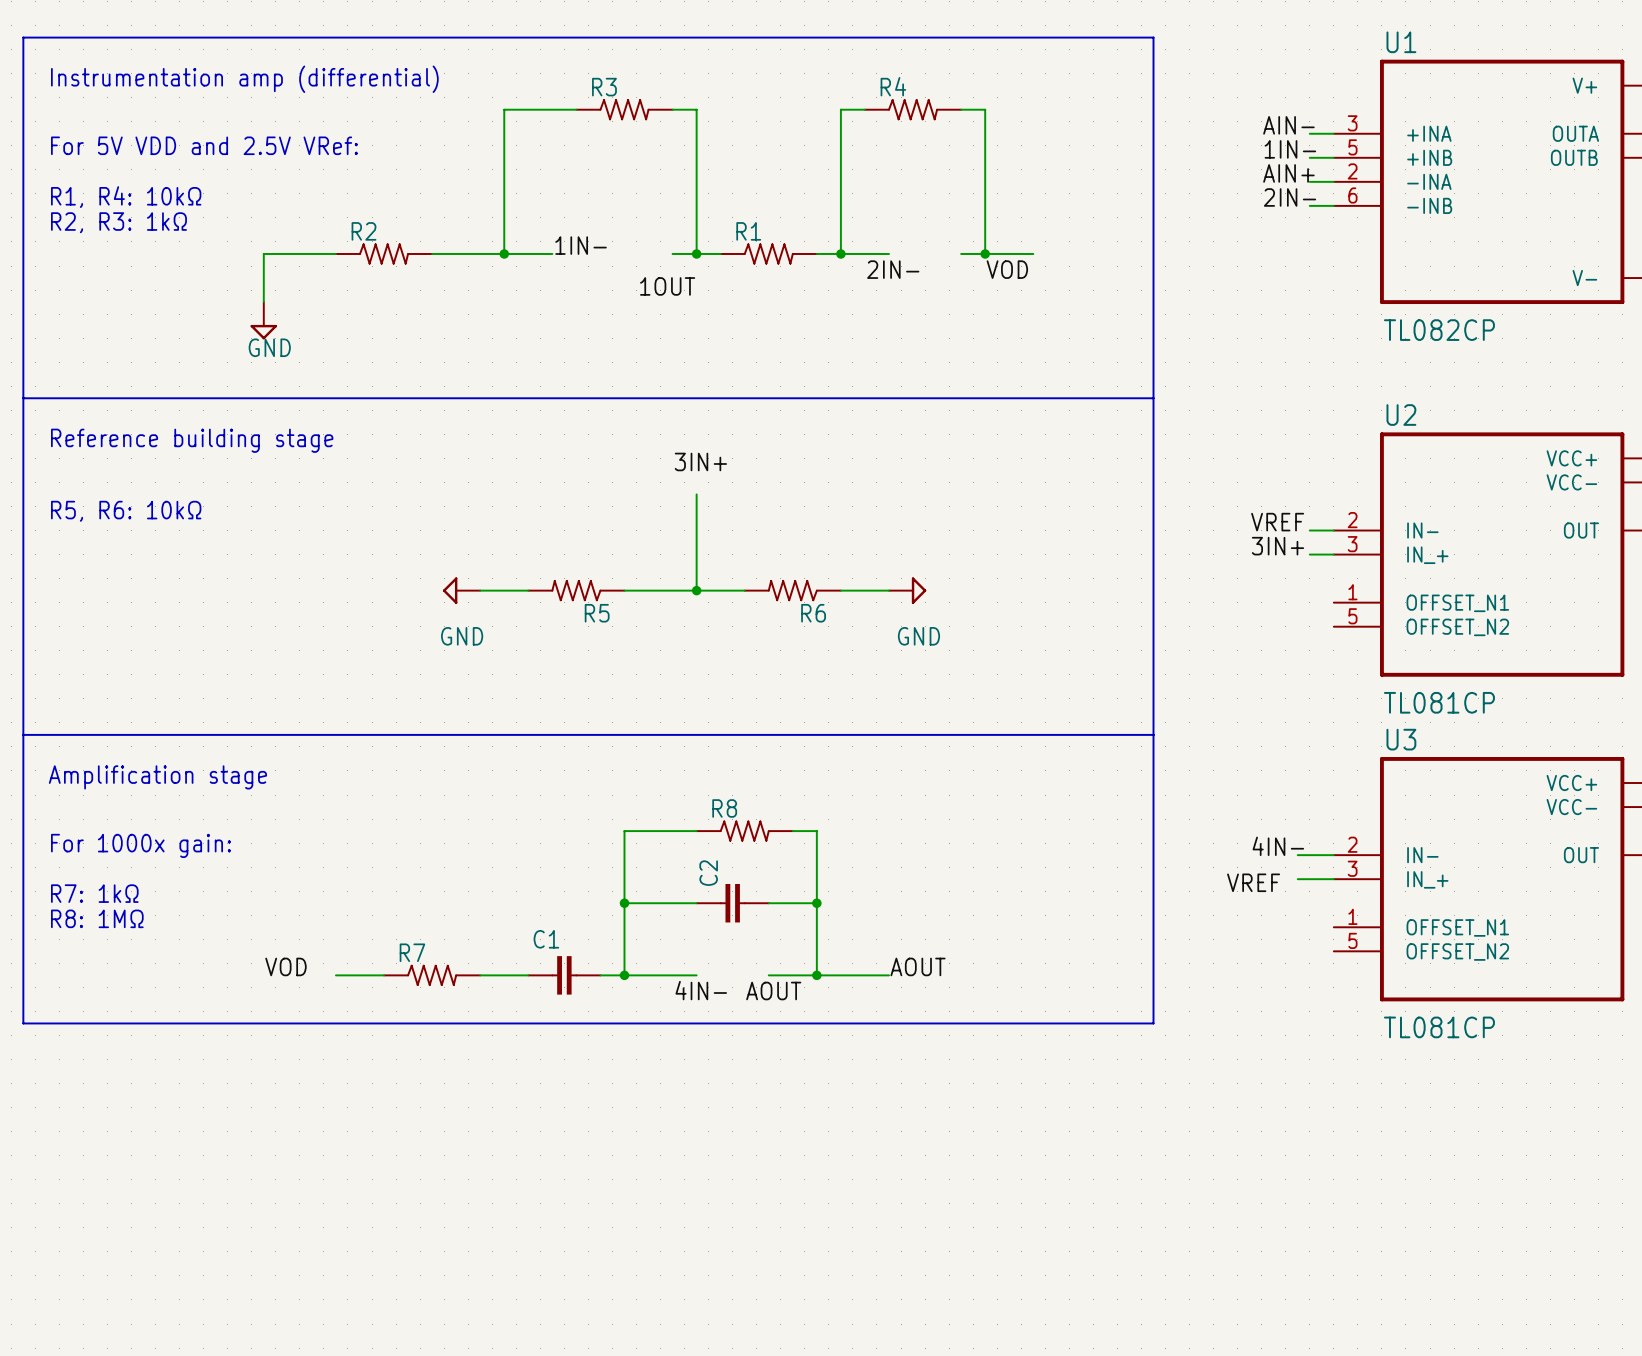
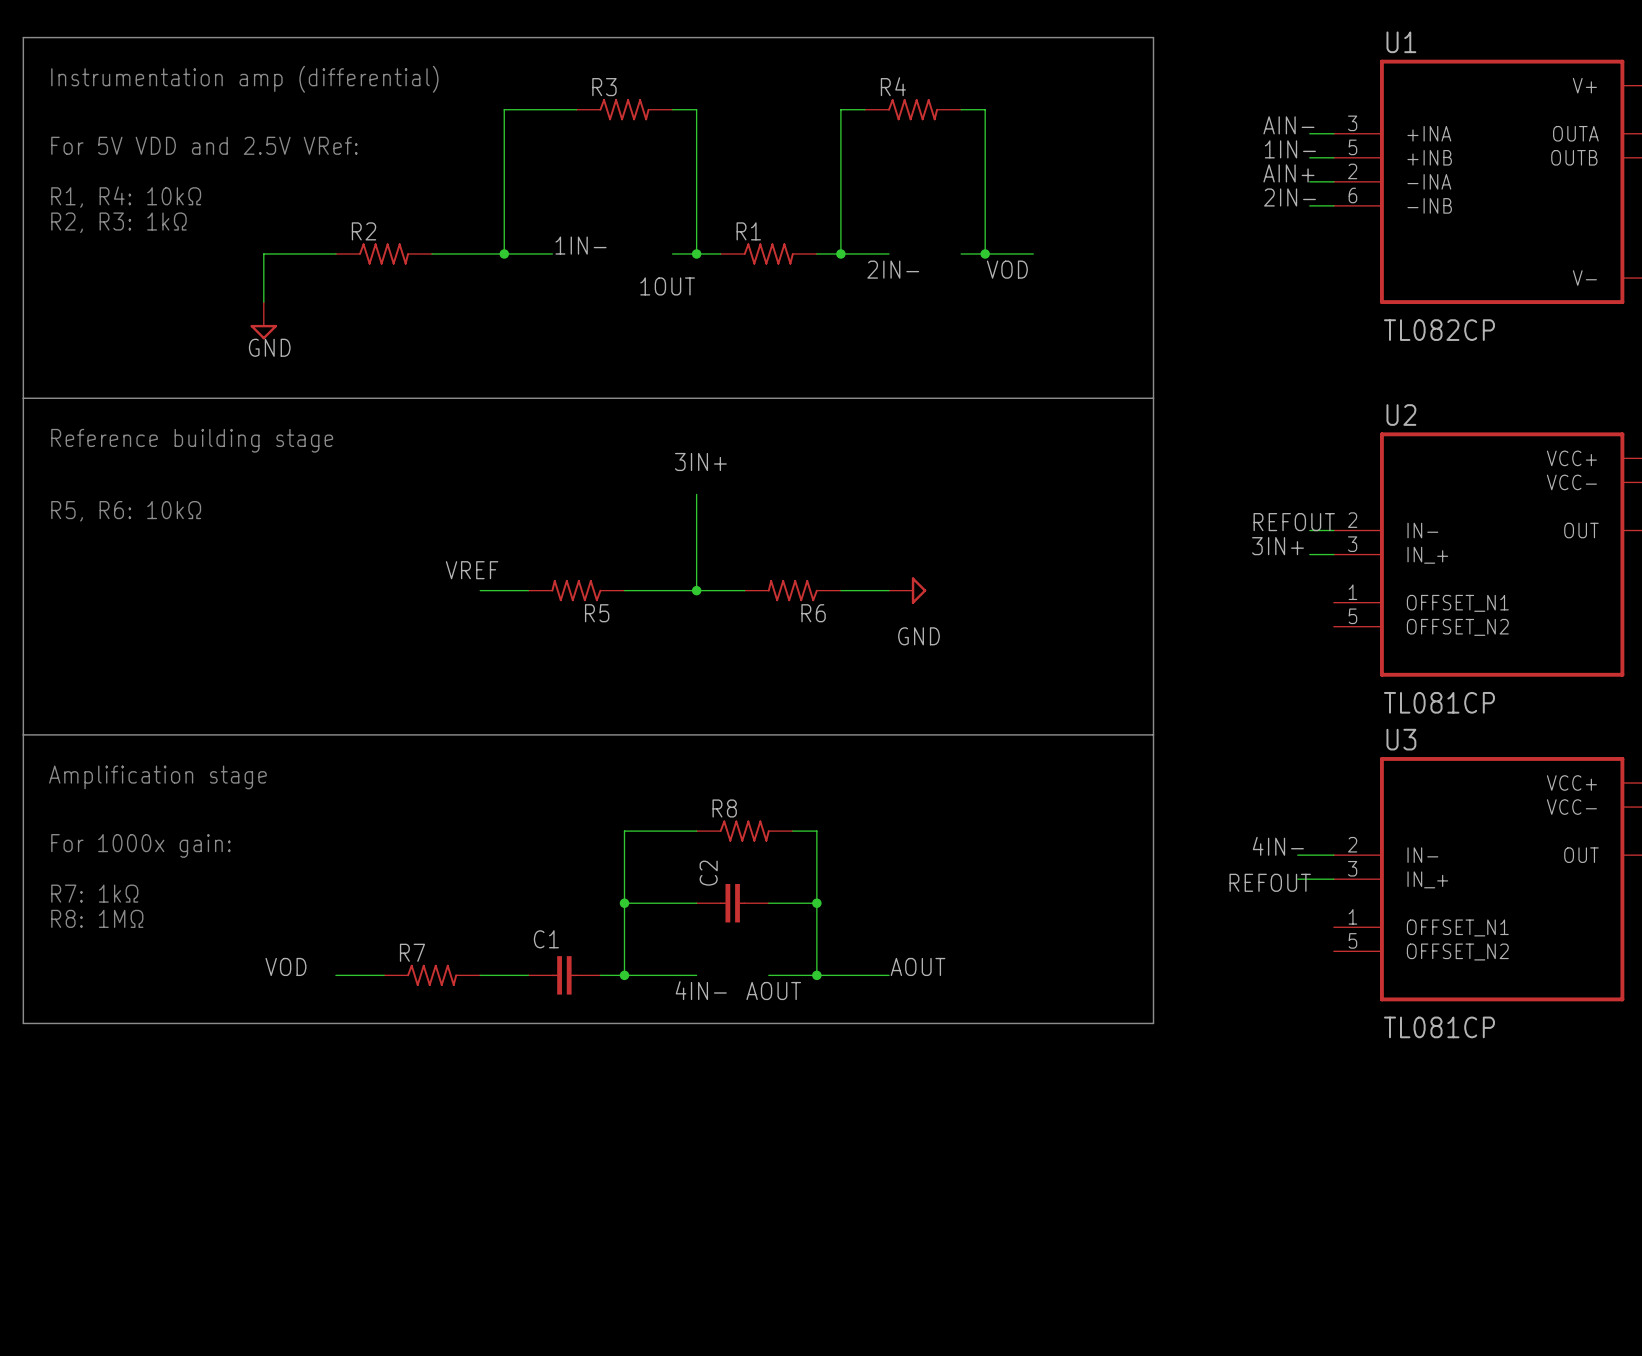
label: VREF (1277, 522) -> REFOUT (1294, 522)
label: none -> VREF (472, 570)
power symbol: GND (461, 590) -> none
label: VREF (1253, 882) -> REFOUT (1270, 882)

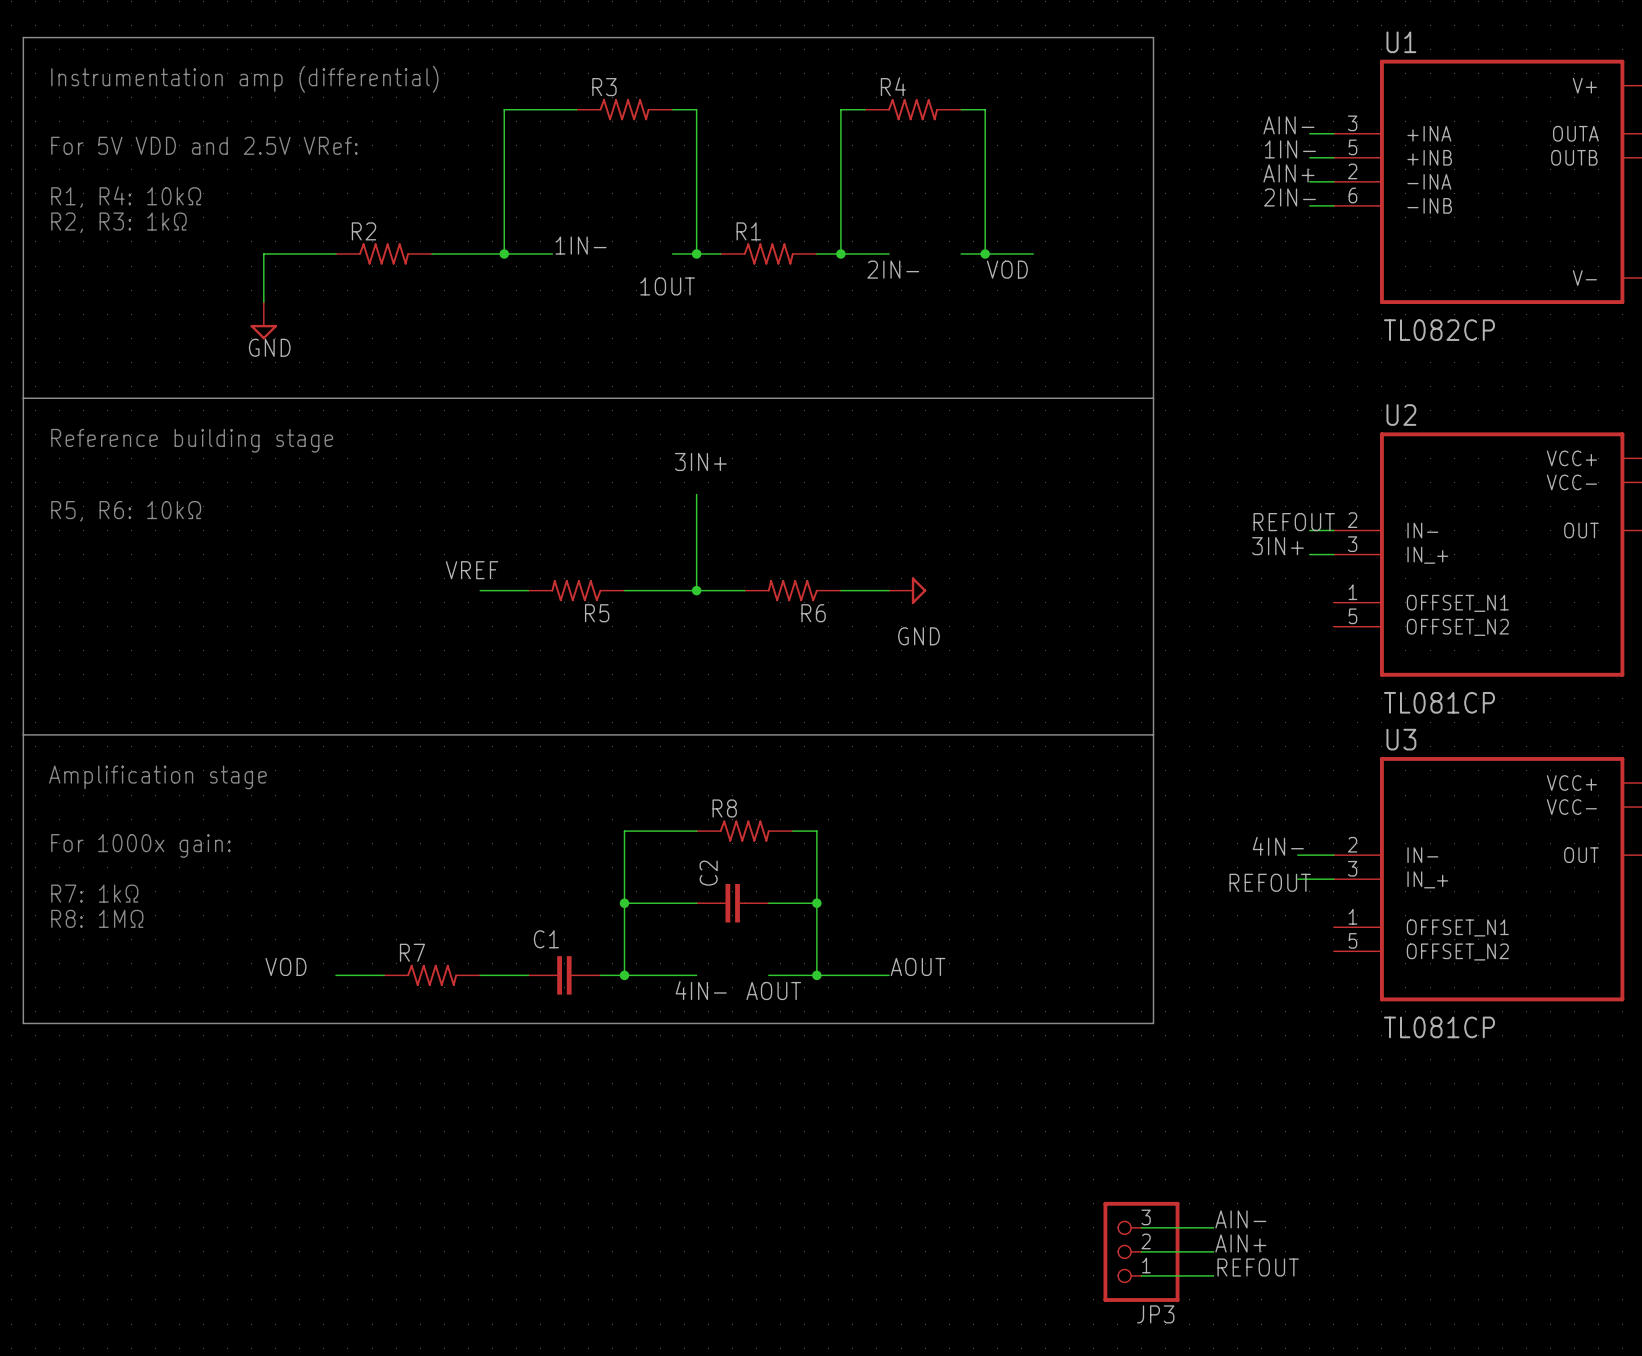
label: none -> AIN- (1240, 1219)
wire: none -> (1141, 1227) (1213, 1227)
label: none -> AIN+ (1240, 1243)
wire: none -> (1141, 1251) (1213, 1251)
JP3: none -> (1141, 1251)
label: none -> REFOUT (1258, 1267)
wire: none -> (1141, 1275) (1213, 1275)

